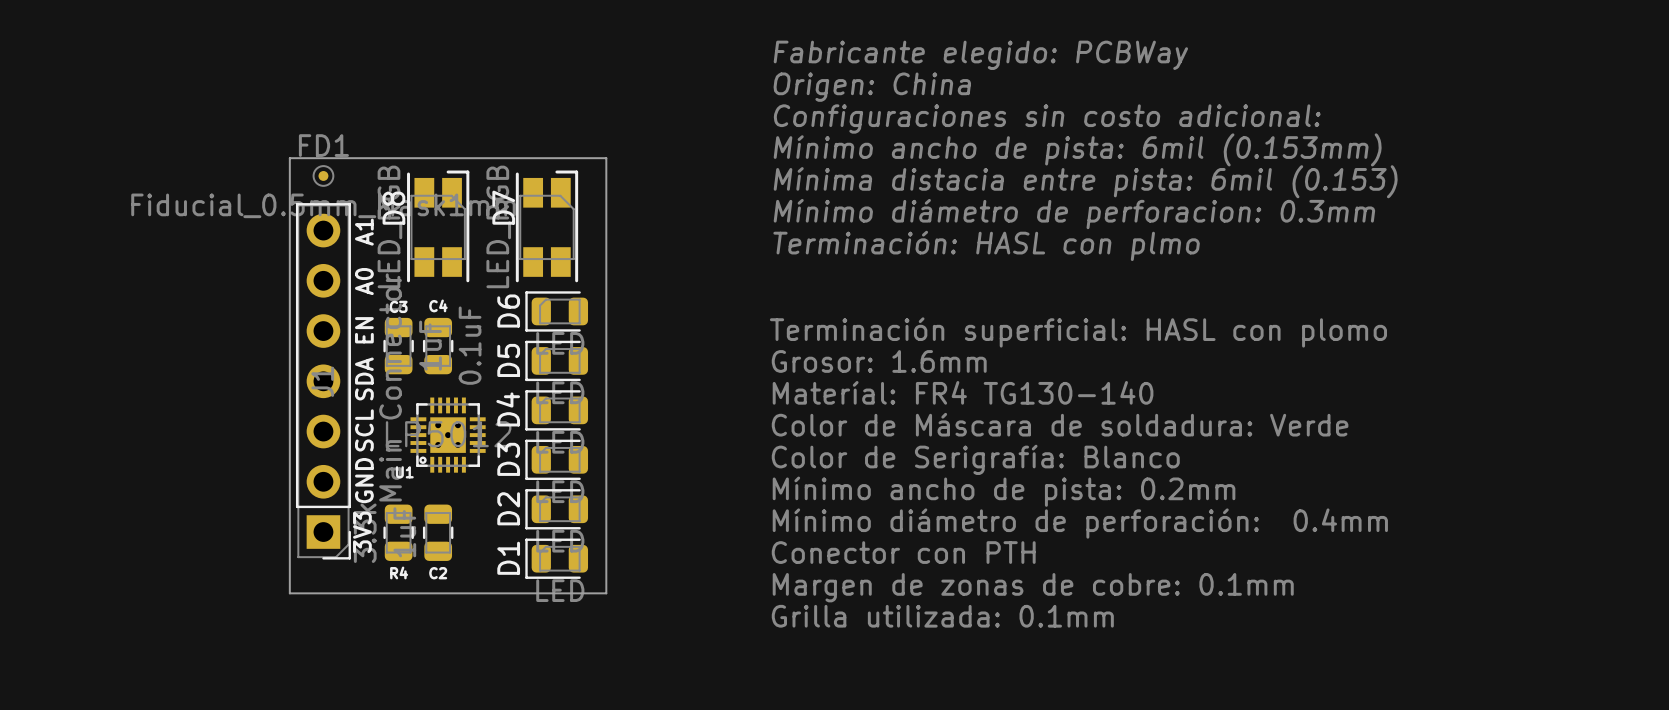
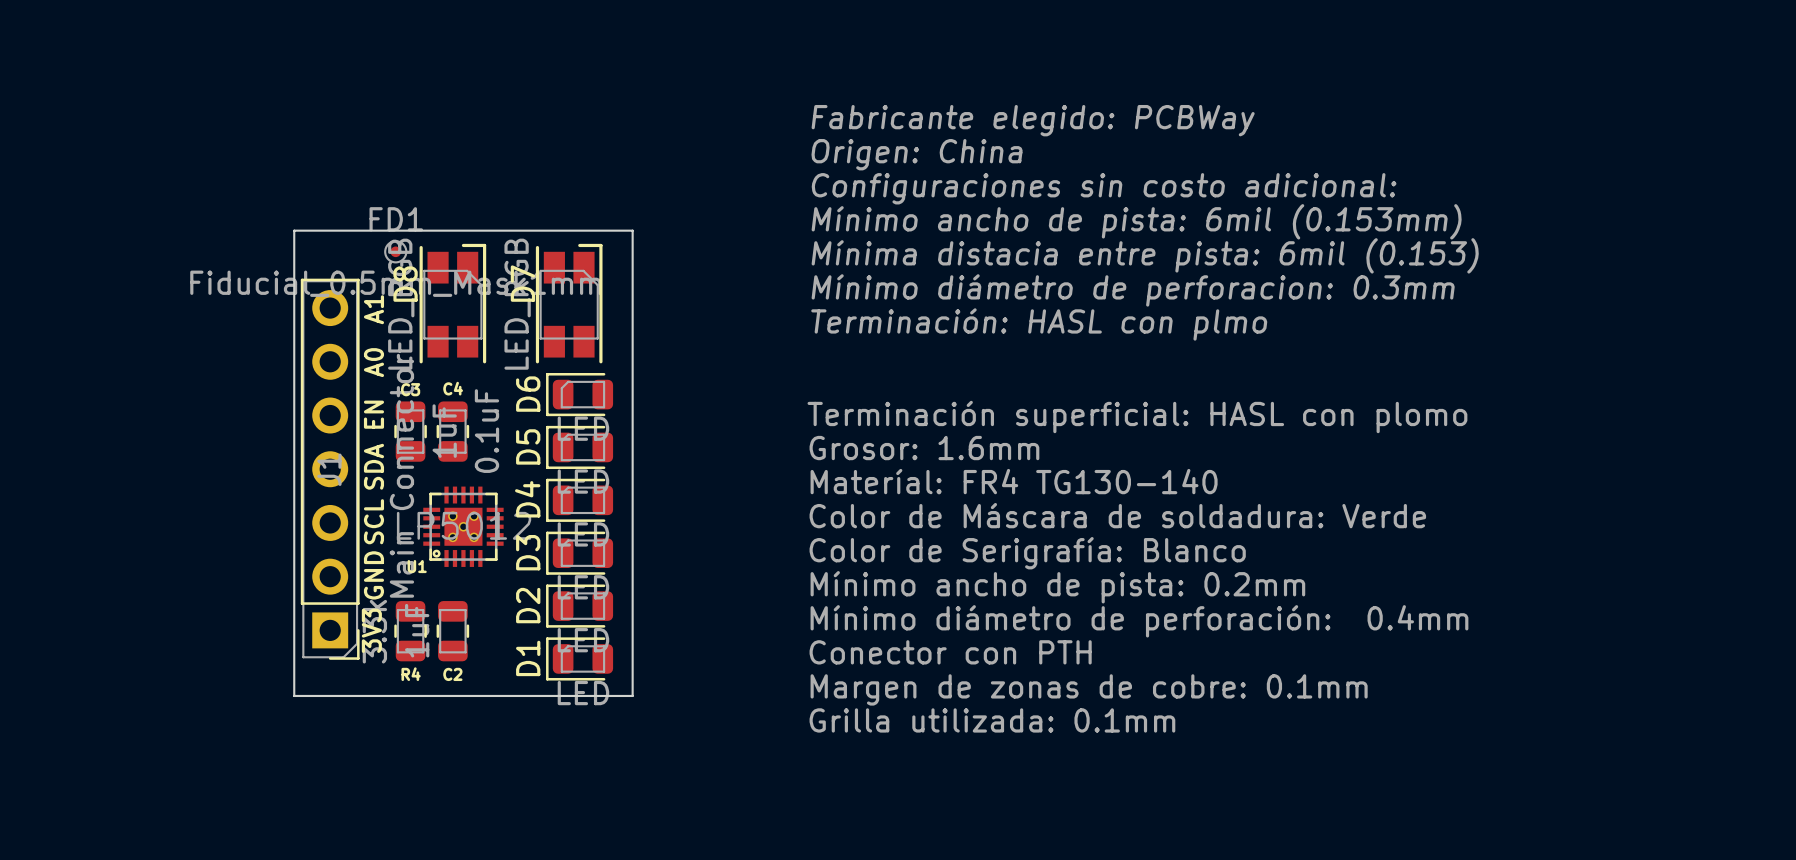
FD1 position: (323, 175) -> (395, 251)

